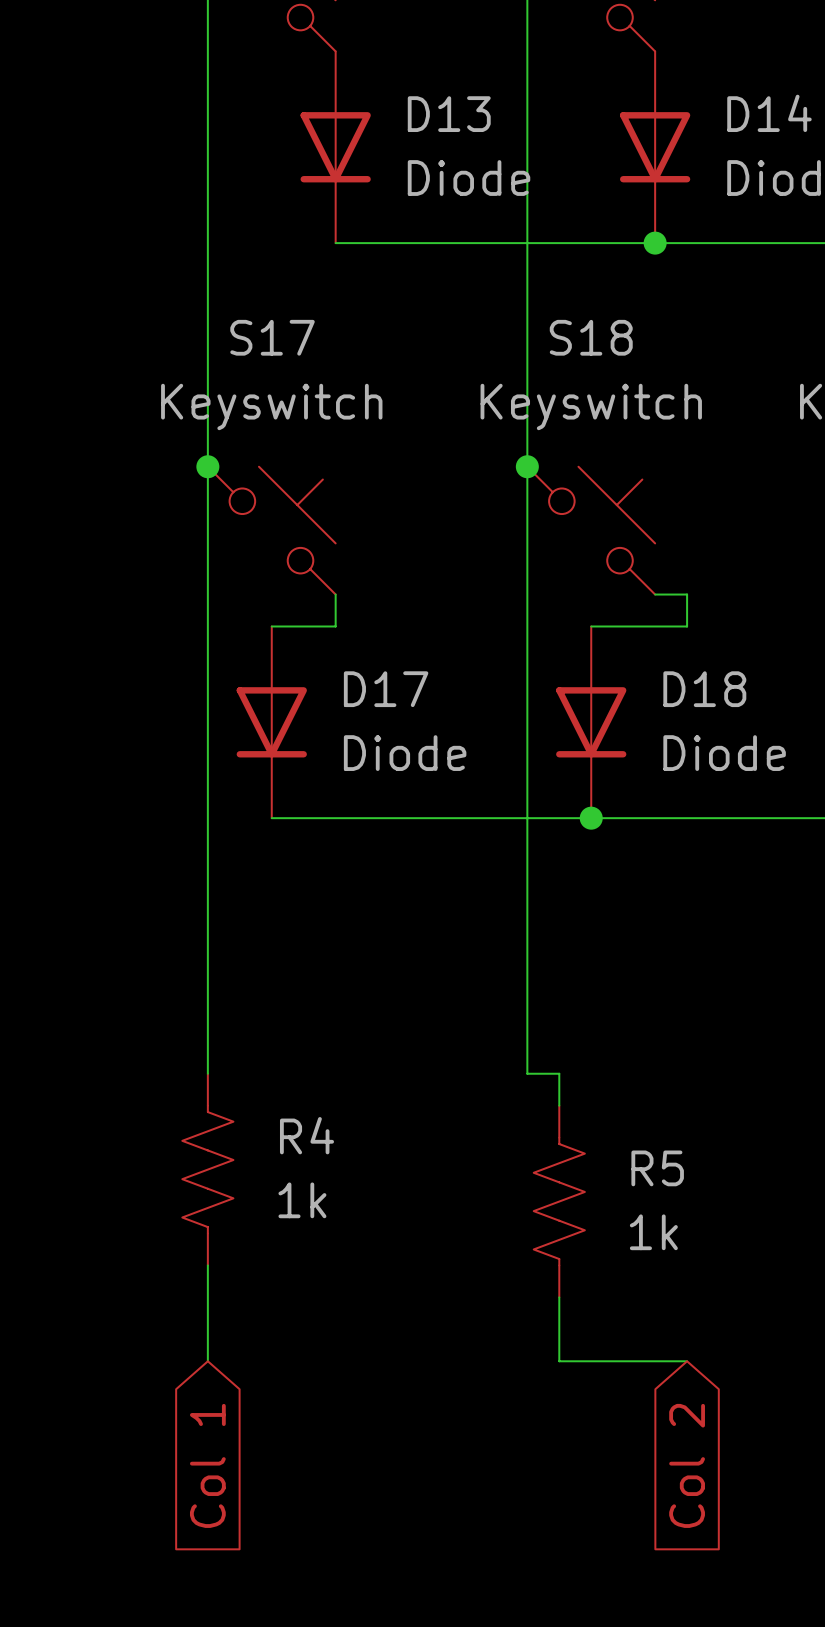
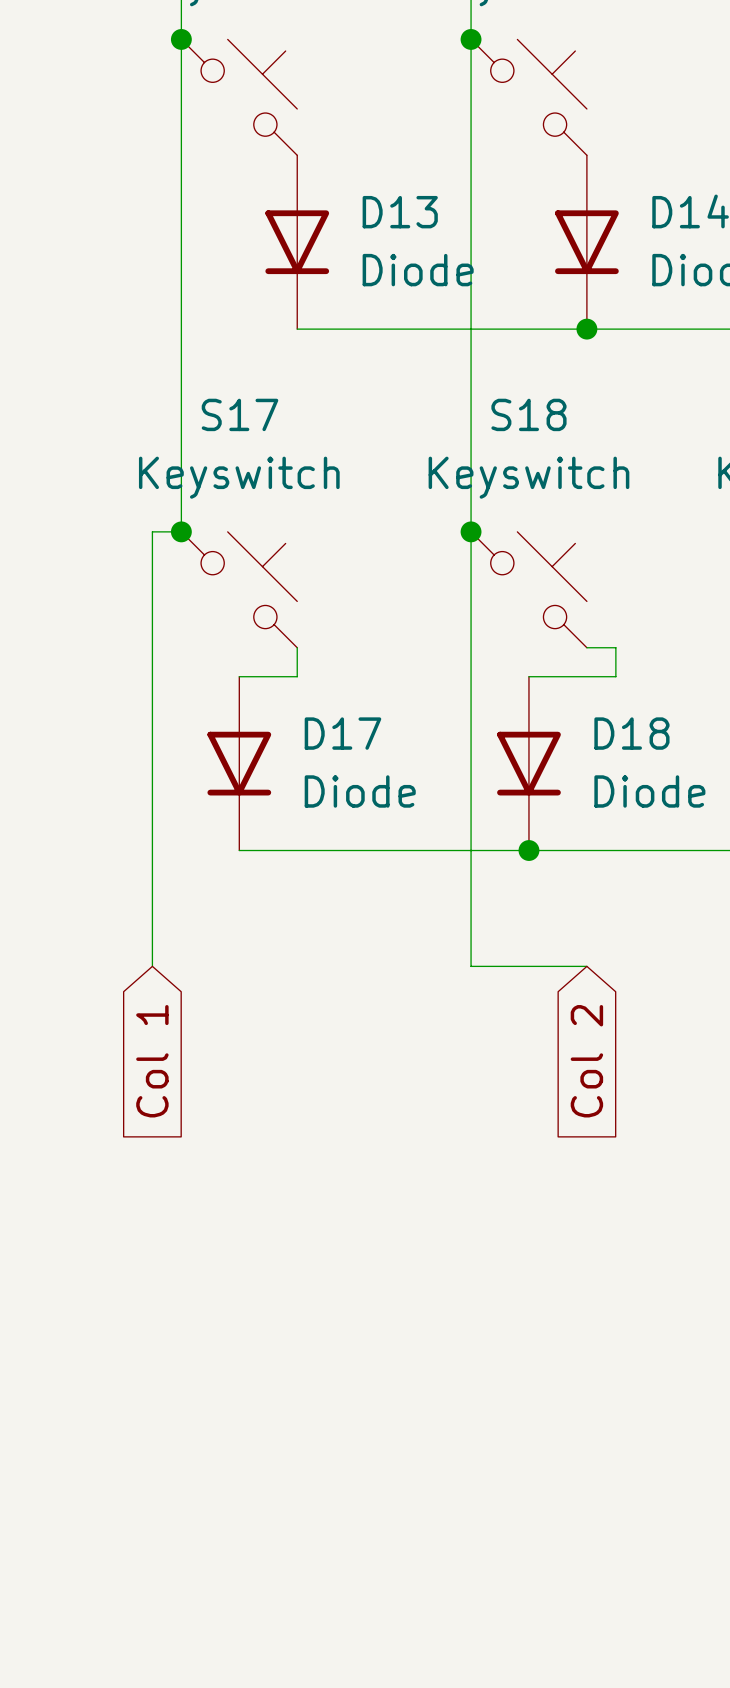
wire: (207, 466) (207, 1073) -> (181, 531) (152, 531) (152, 966)
wire: (527, 945) (527, 1073) (559, 1073) (559, 1105) -> (471, 966) (586, 966)
R4: 1k (207, 1169) -> none
R5: 1k (559, 1201) -> none
wire: (207, 1265) (207, 1361) -> none
wire: (559, 1297) (559, 1361) (687, 1361) -> none
global label position: Col 1 (207, 1465) -> Col 1 (152, 1061)
global label position: Col 2 (687, 1465) -> Col 2 (586, 1061)

